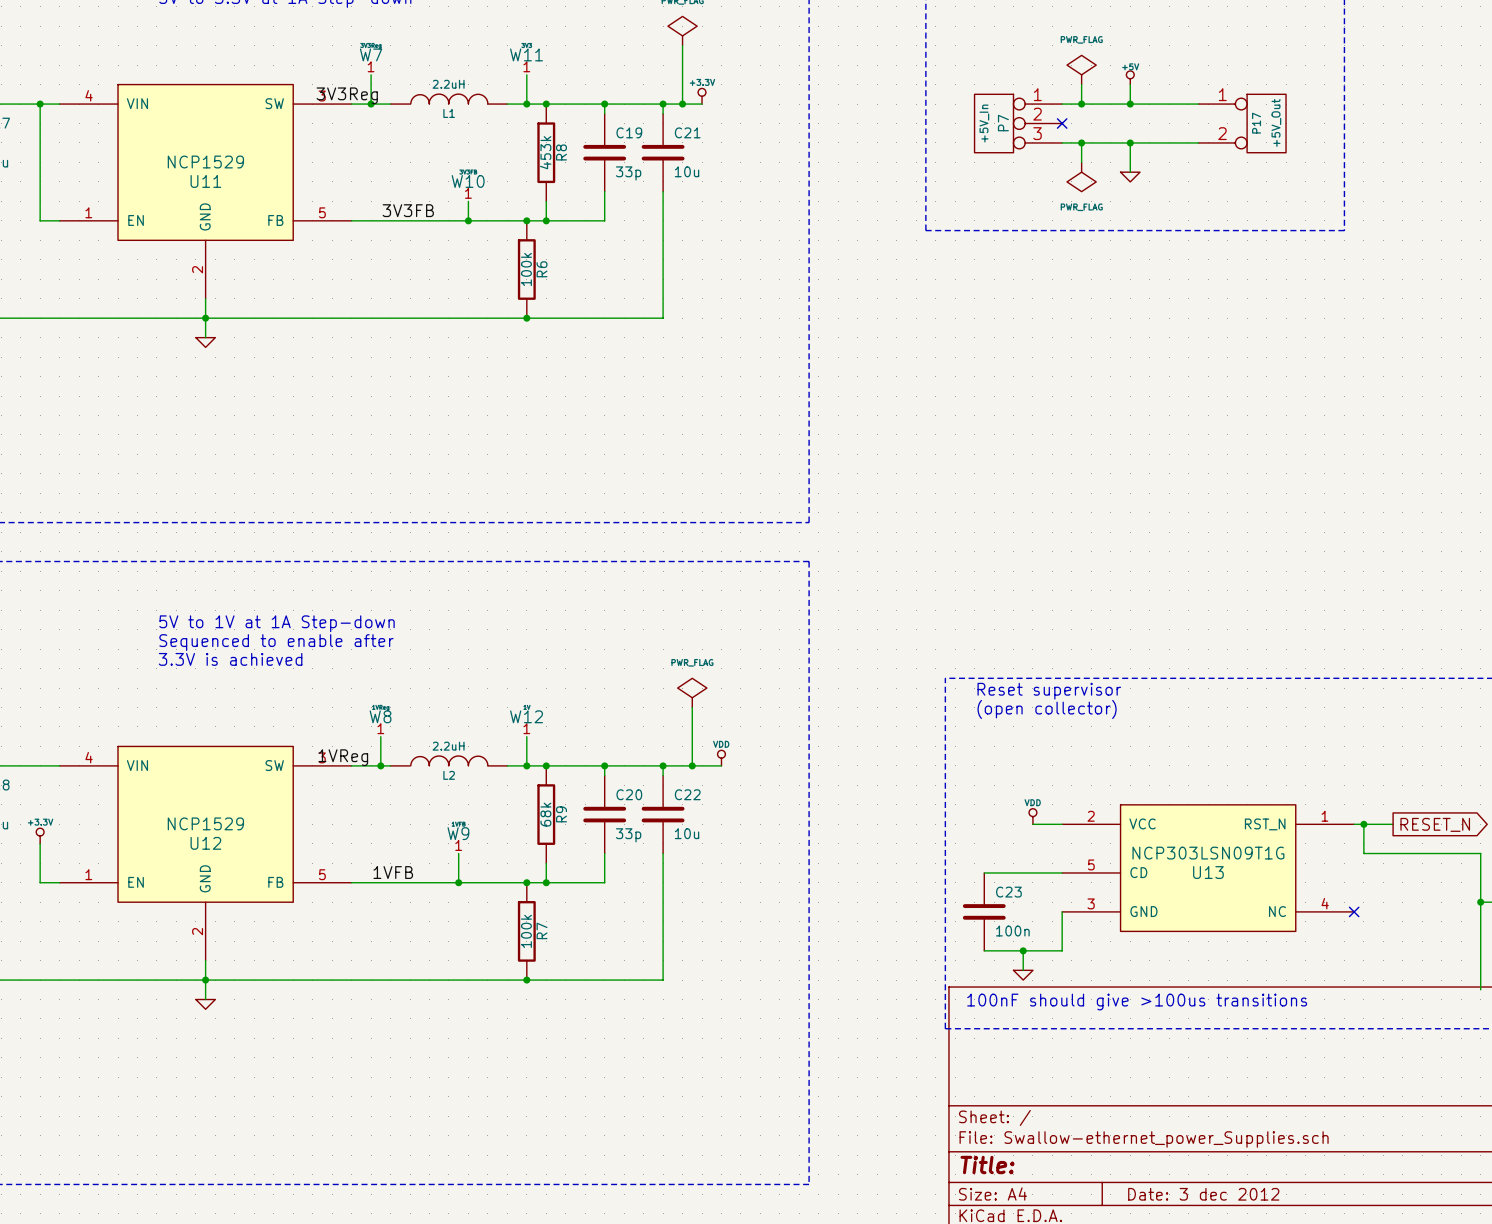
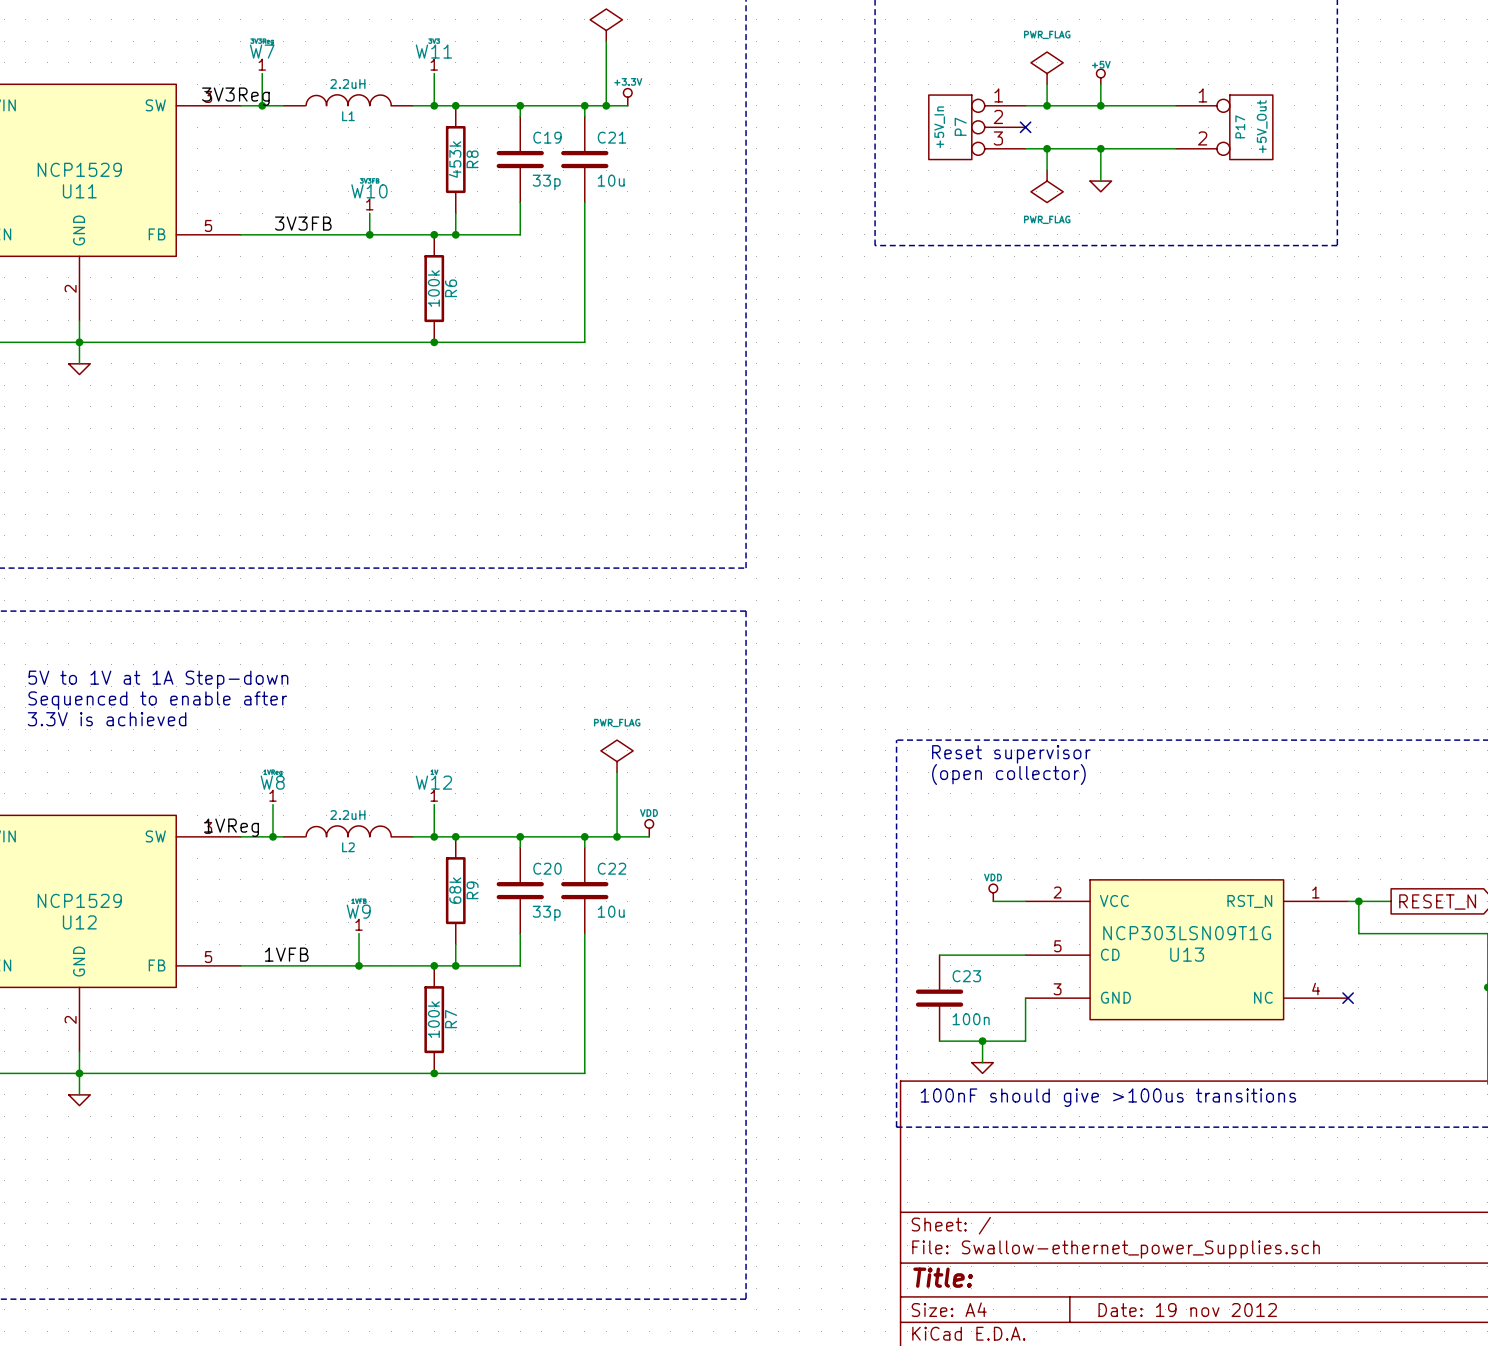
title block: Date: 3 dec 2012 (1203, 1194) -> Date: 19 nov 2012 (1187, 1310)

